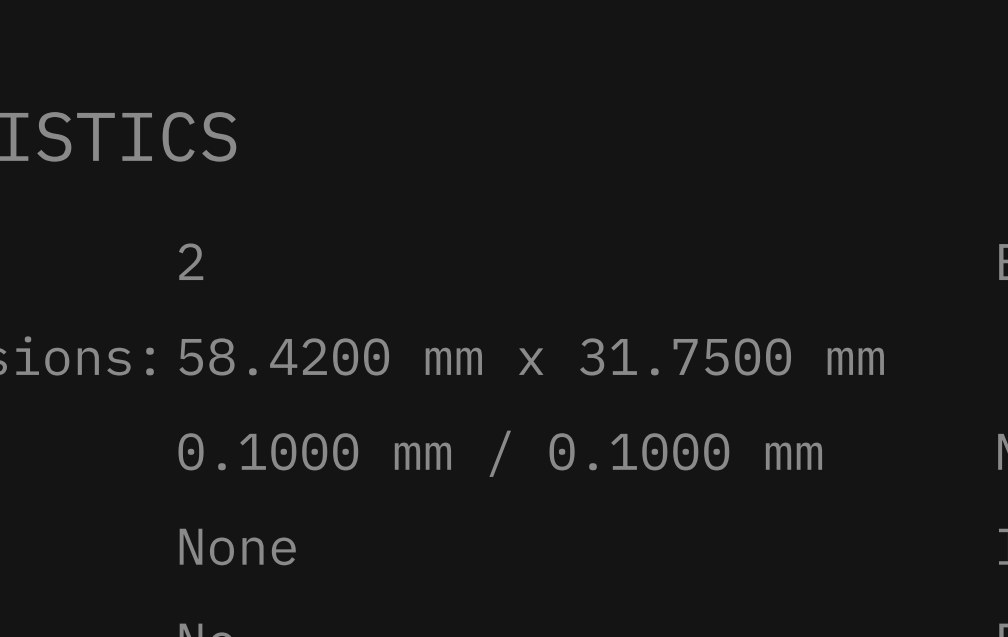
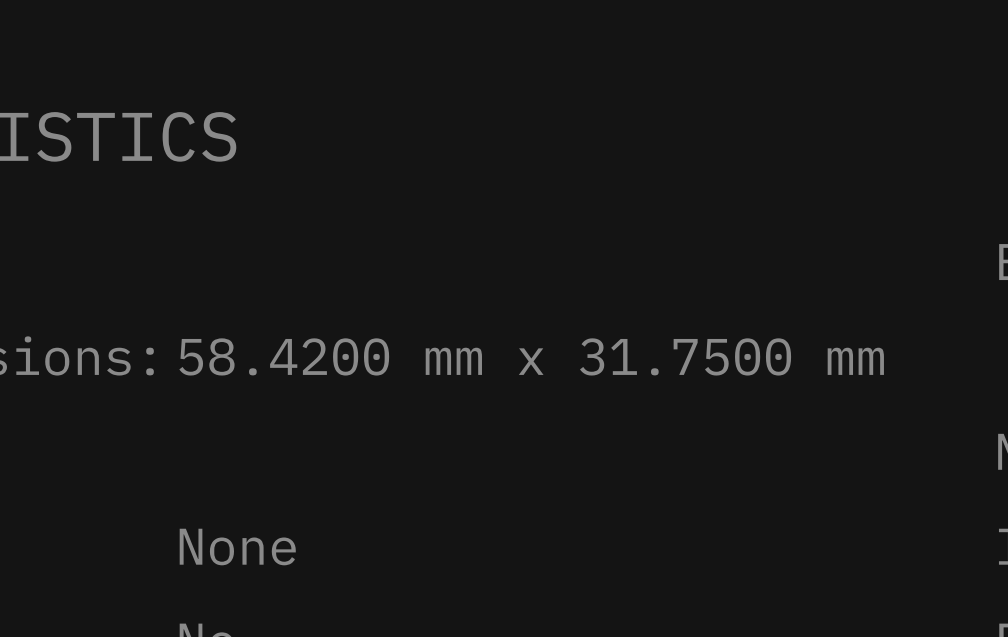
text: 2 (191, 261) -> none
text: 0.1000 mm / 0.1000 mm (500, 453) -> none

